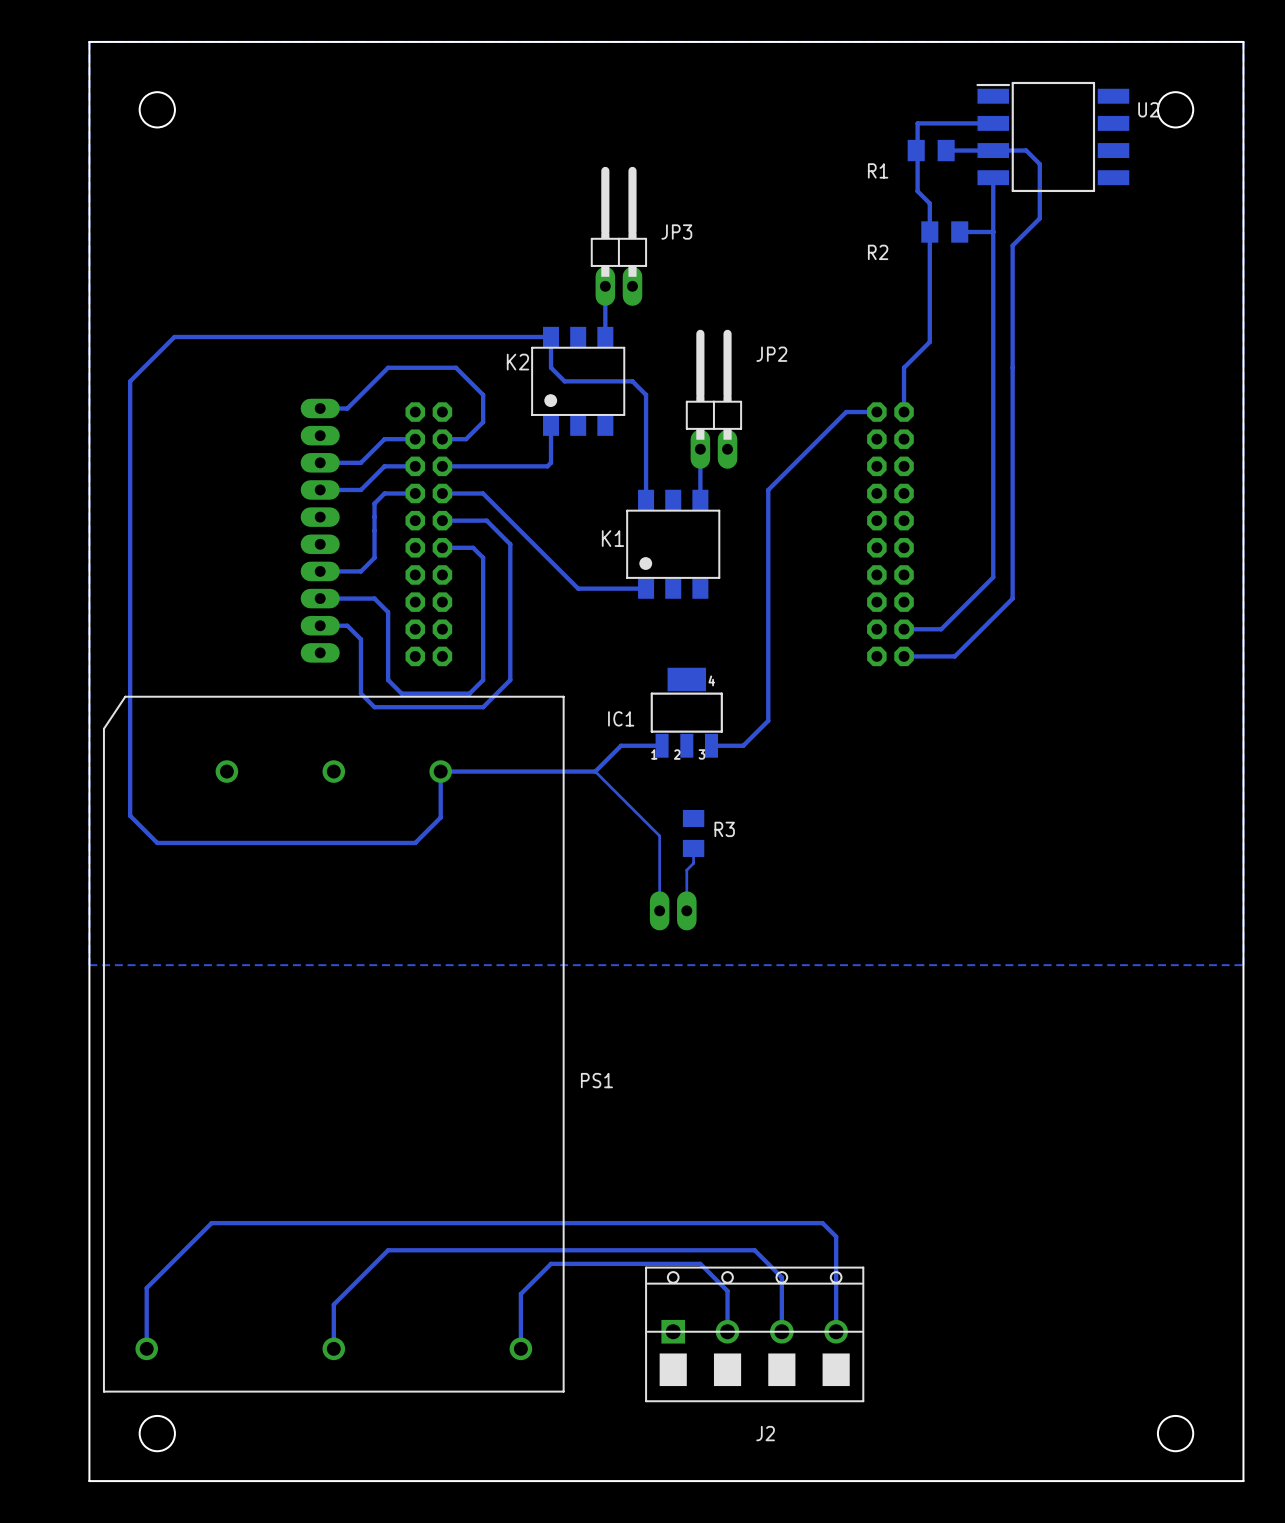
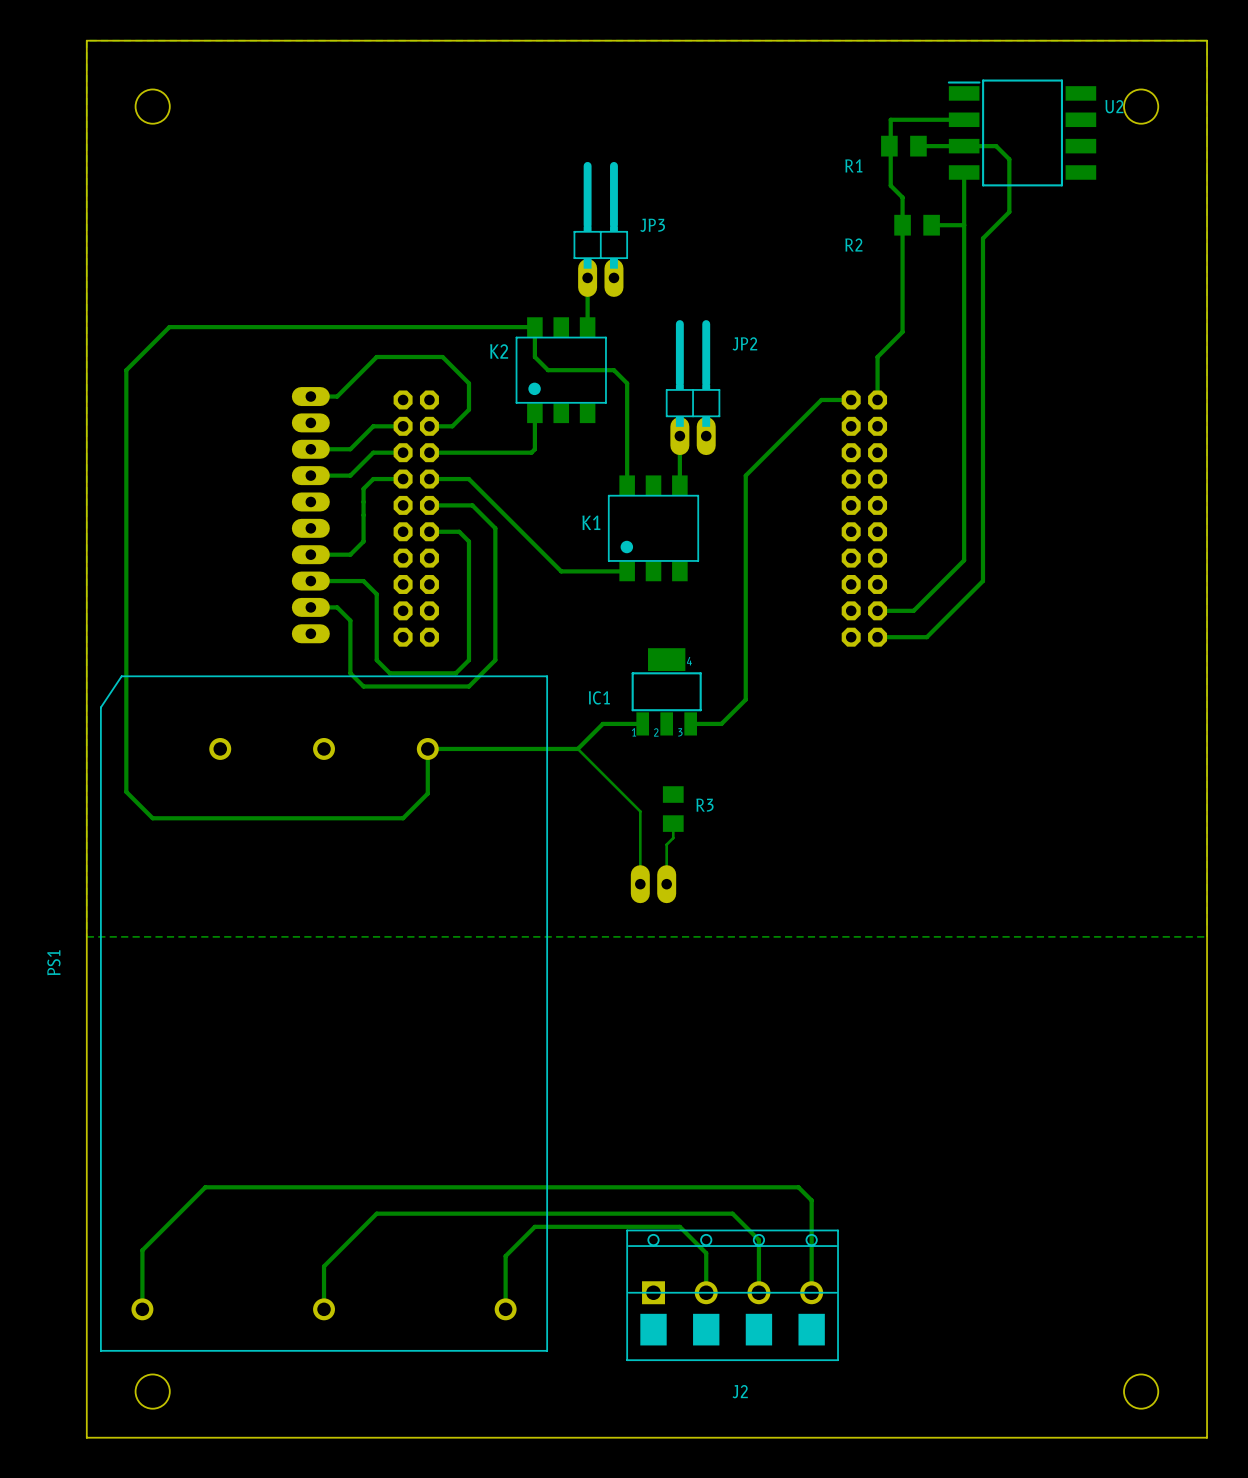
PS1 name rotation: 0° (596, 1080) -> 90° counterclockwise (53, 962)
PS1 name position: PS1 (596, 1080) -> PS1 (53, 962)

